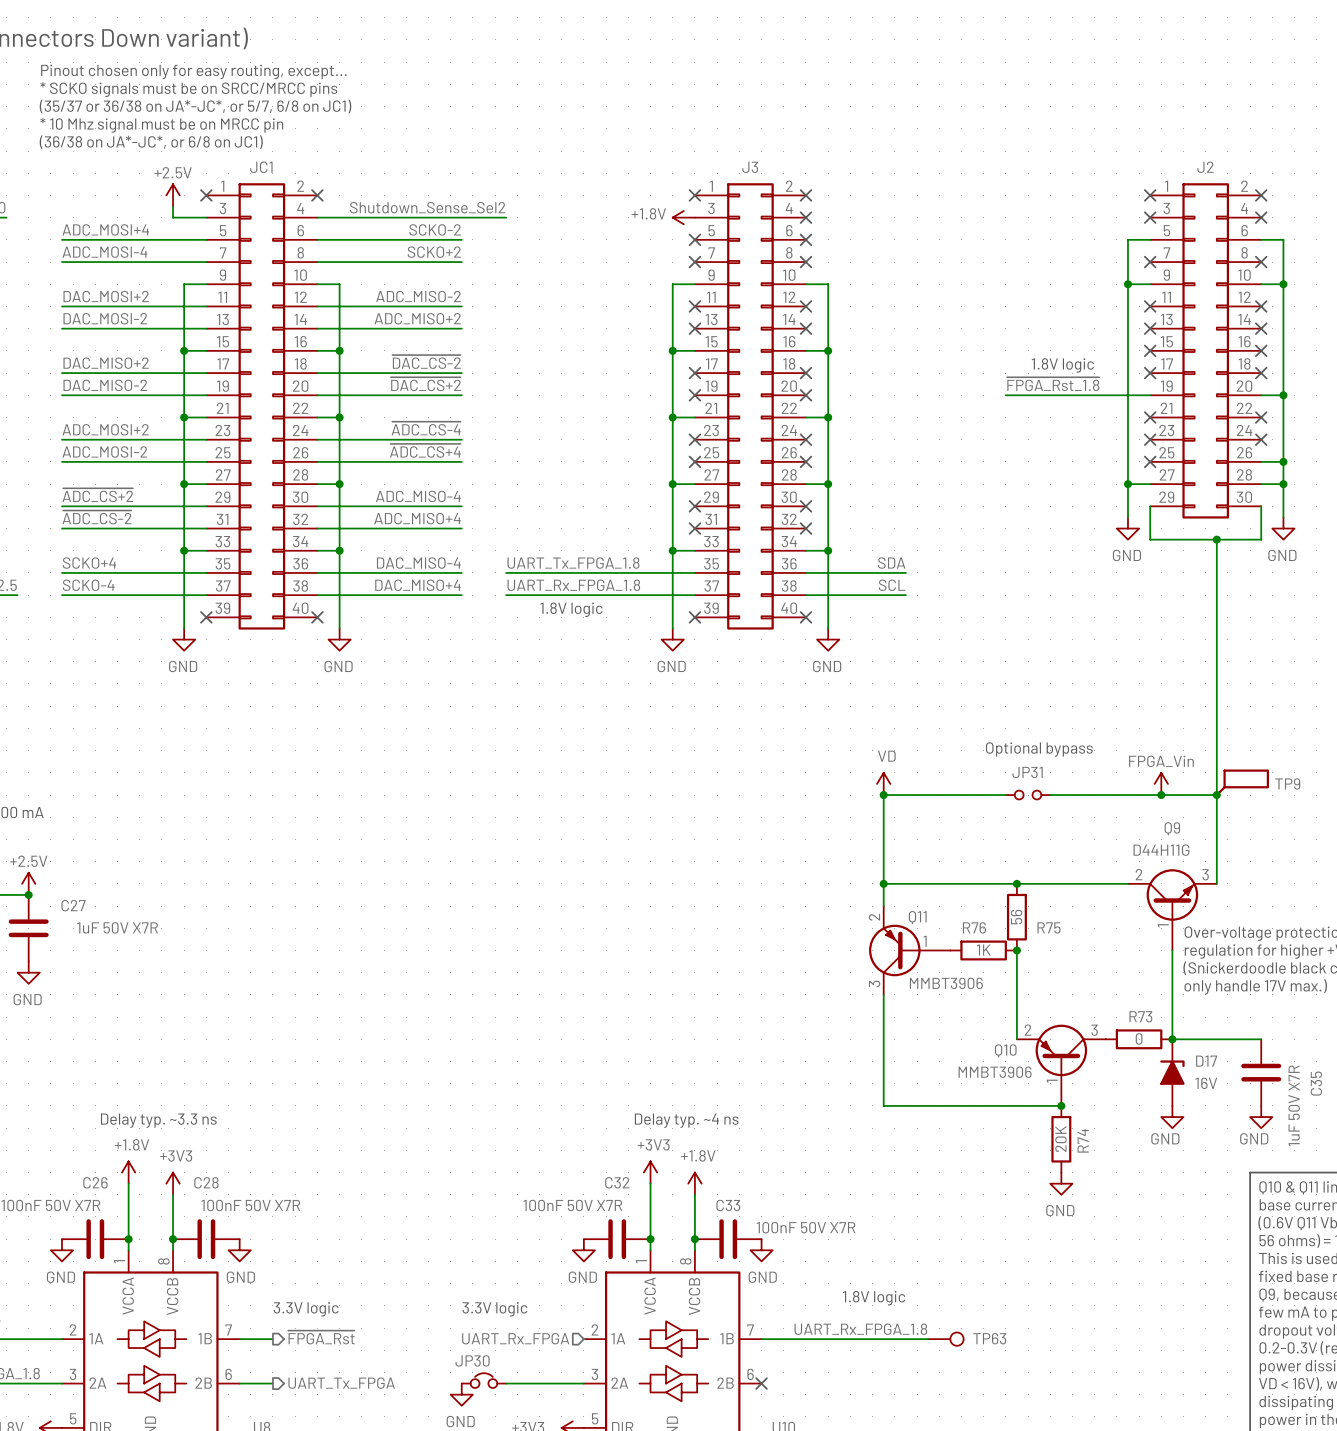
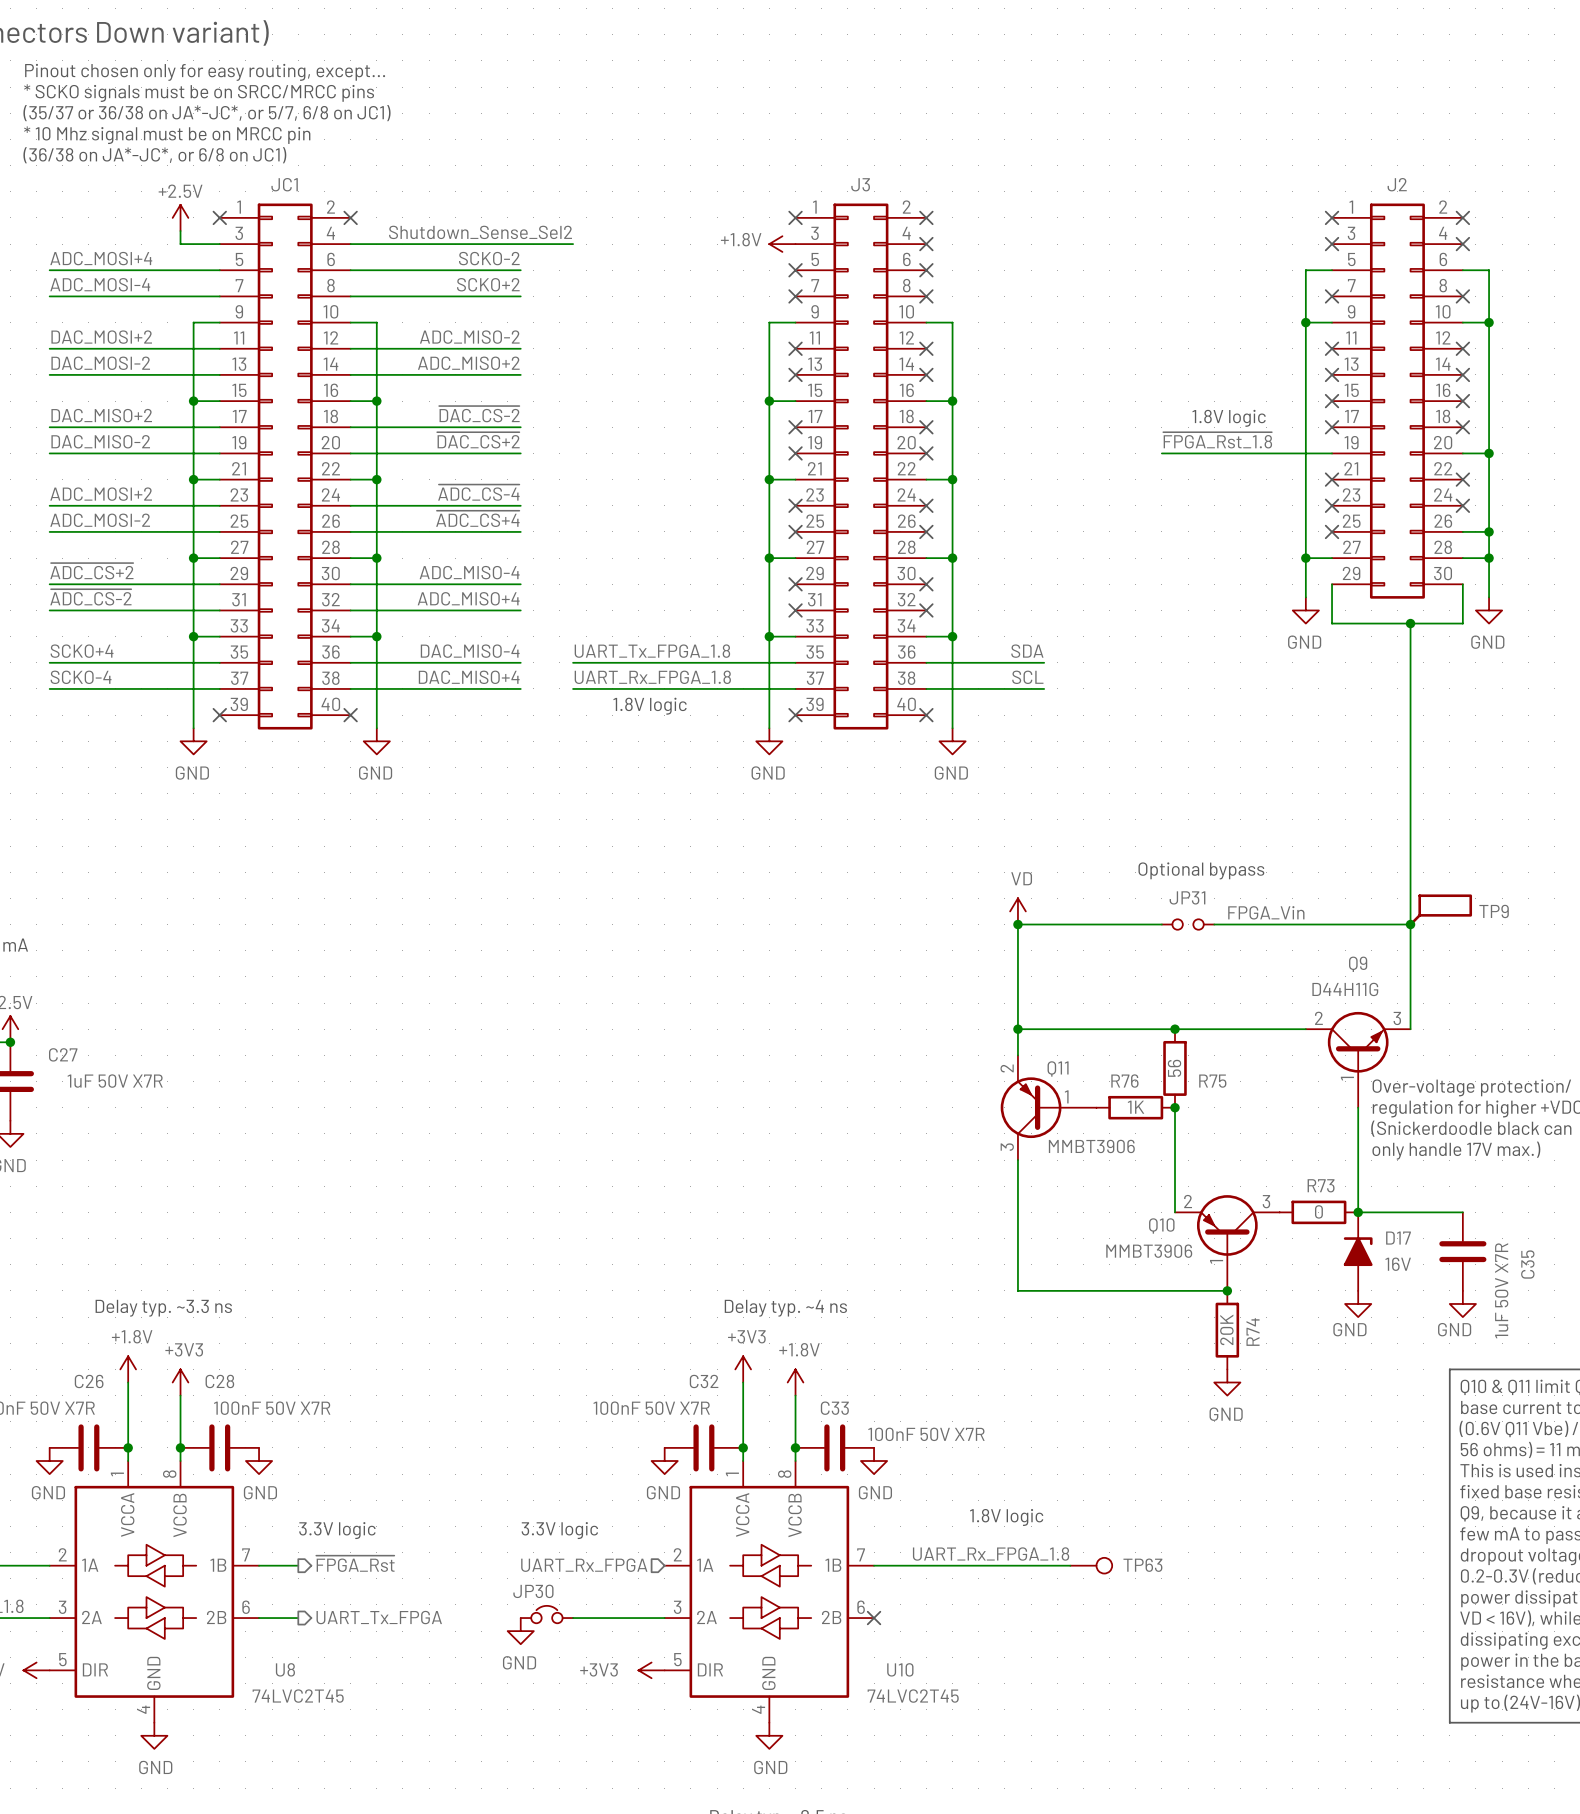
power symbol: FPGA_Vin (1161, 783) -> none
label: none -> FPGA_Vin (1266, 912)
junction: (1161, 795) -> none

